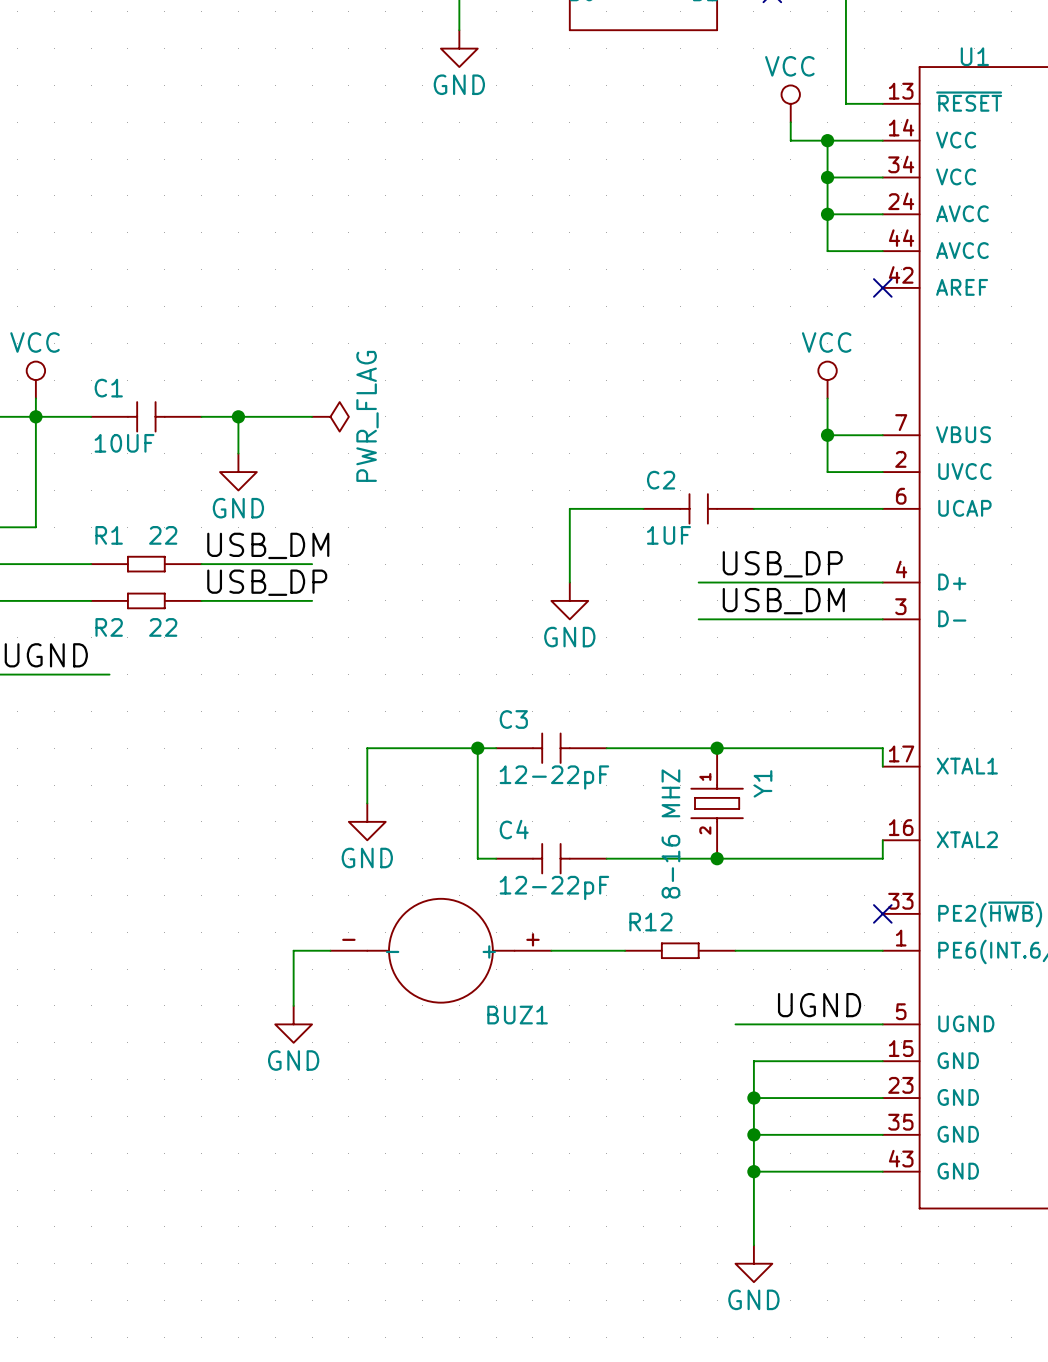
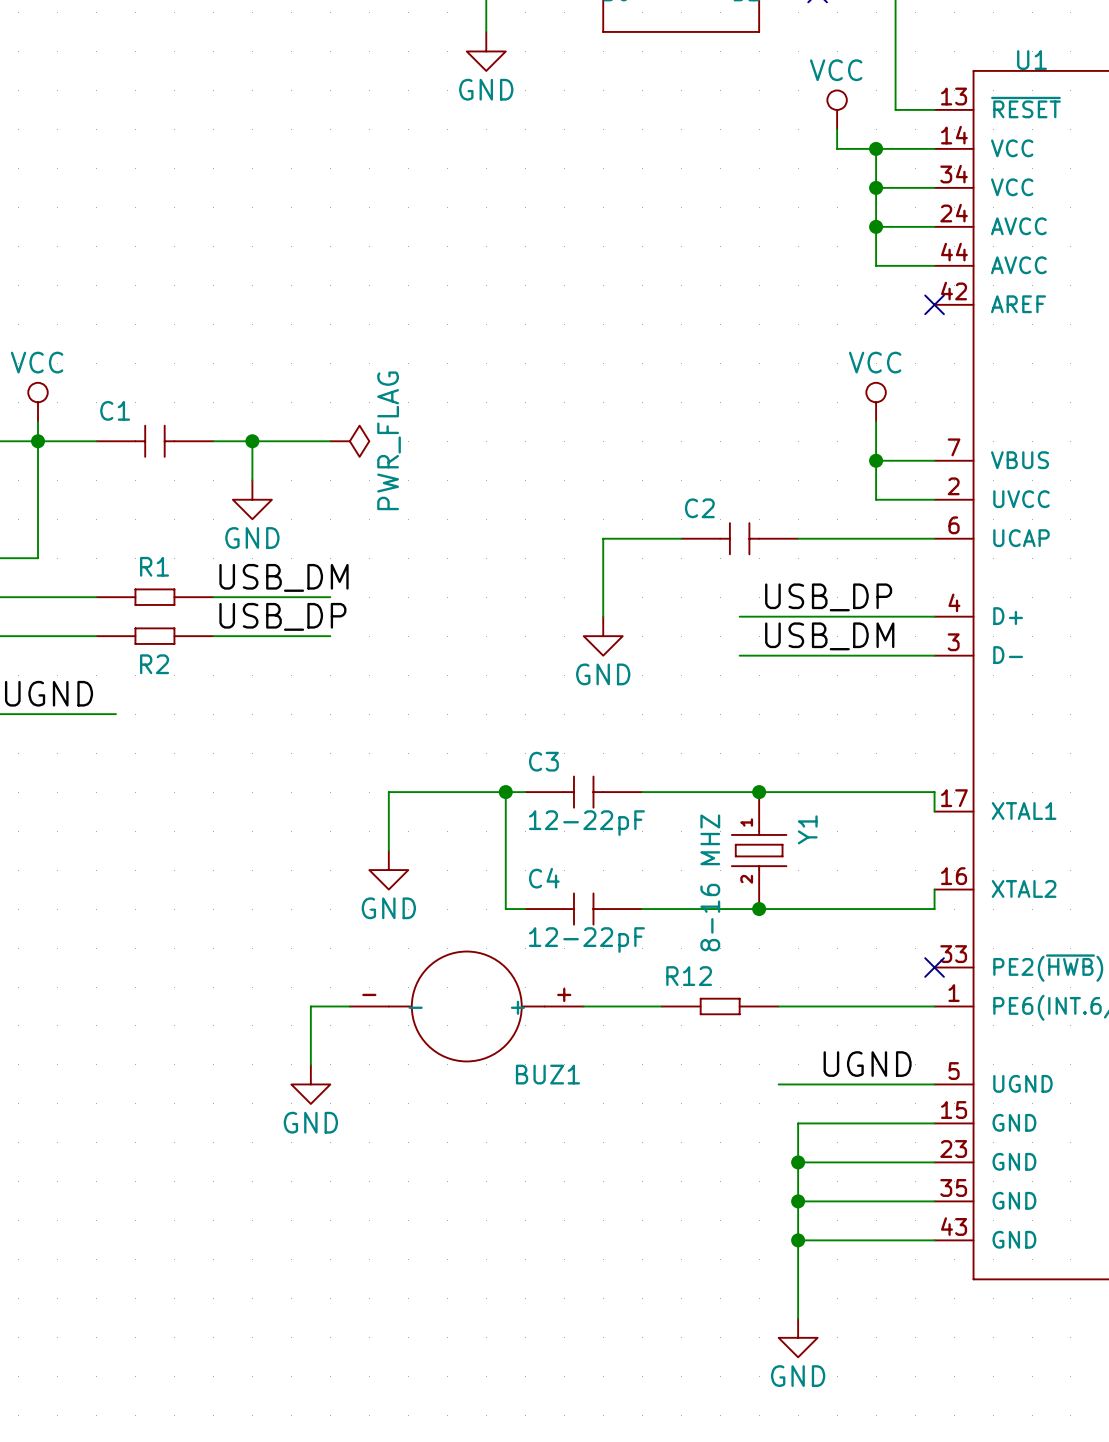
C1 value: 10UF (124, 443) -> none
R1 name position: R1 (109, 535) -> R1 (154, 566)
R1 value: 22 (163, 535) -> none
C2 value: 1UF (668, 535) -> none
R2 name position: R2 (109, 627) -> R2 (154, 664)
R2 value: 22 (163, 627) -> none

